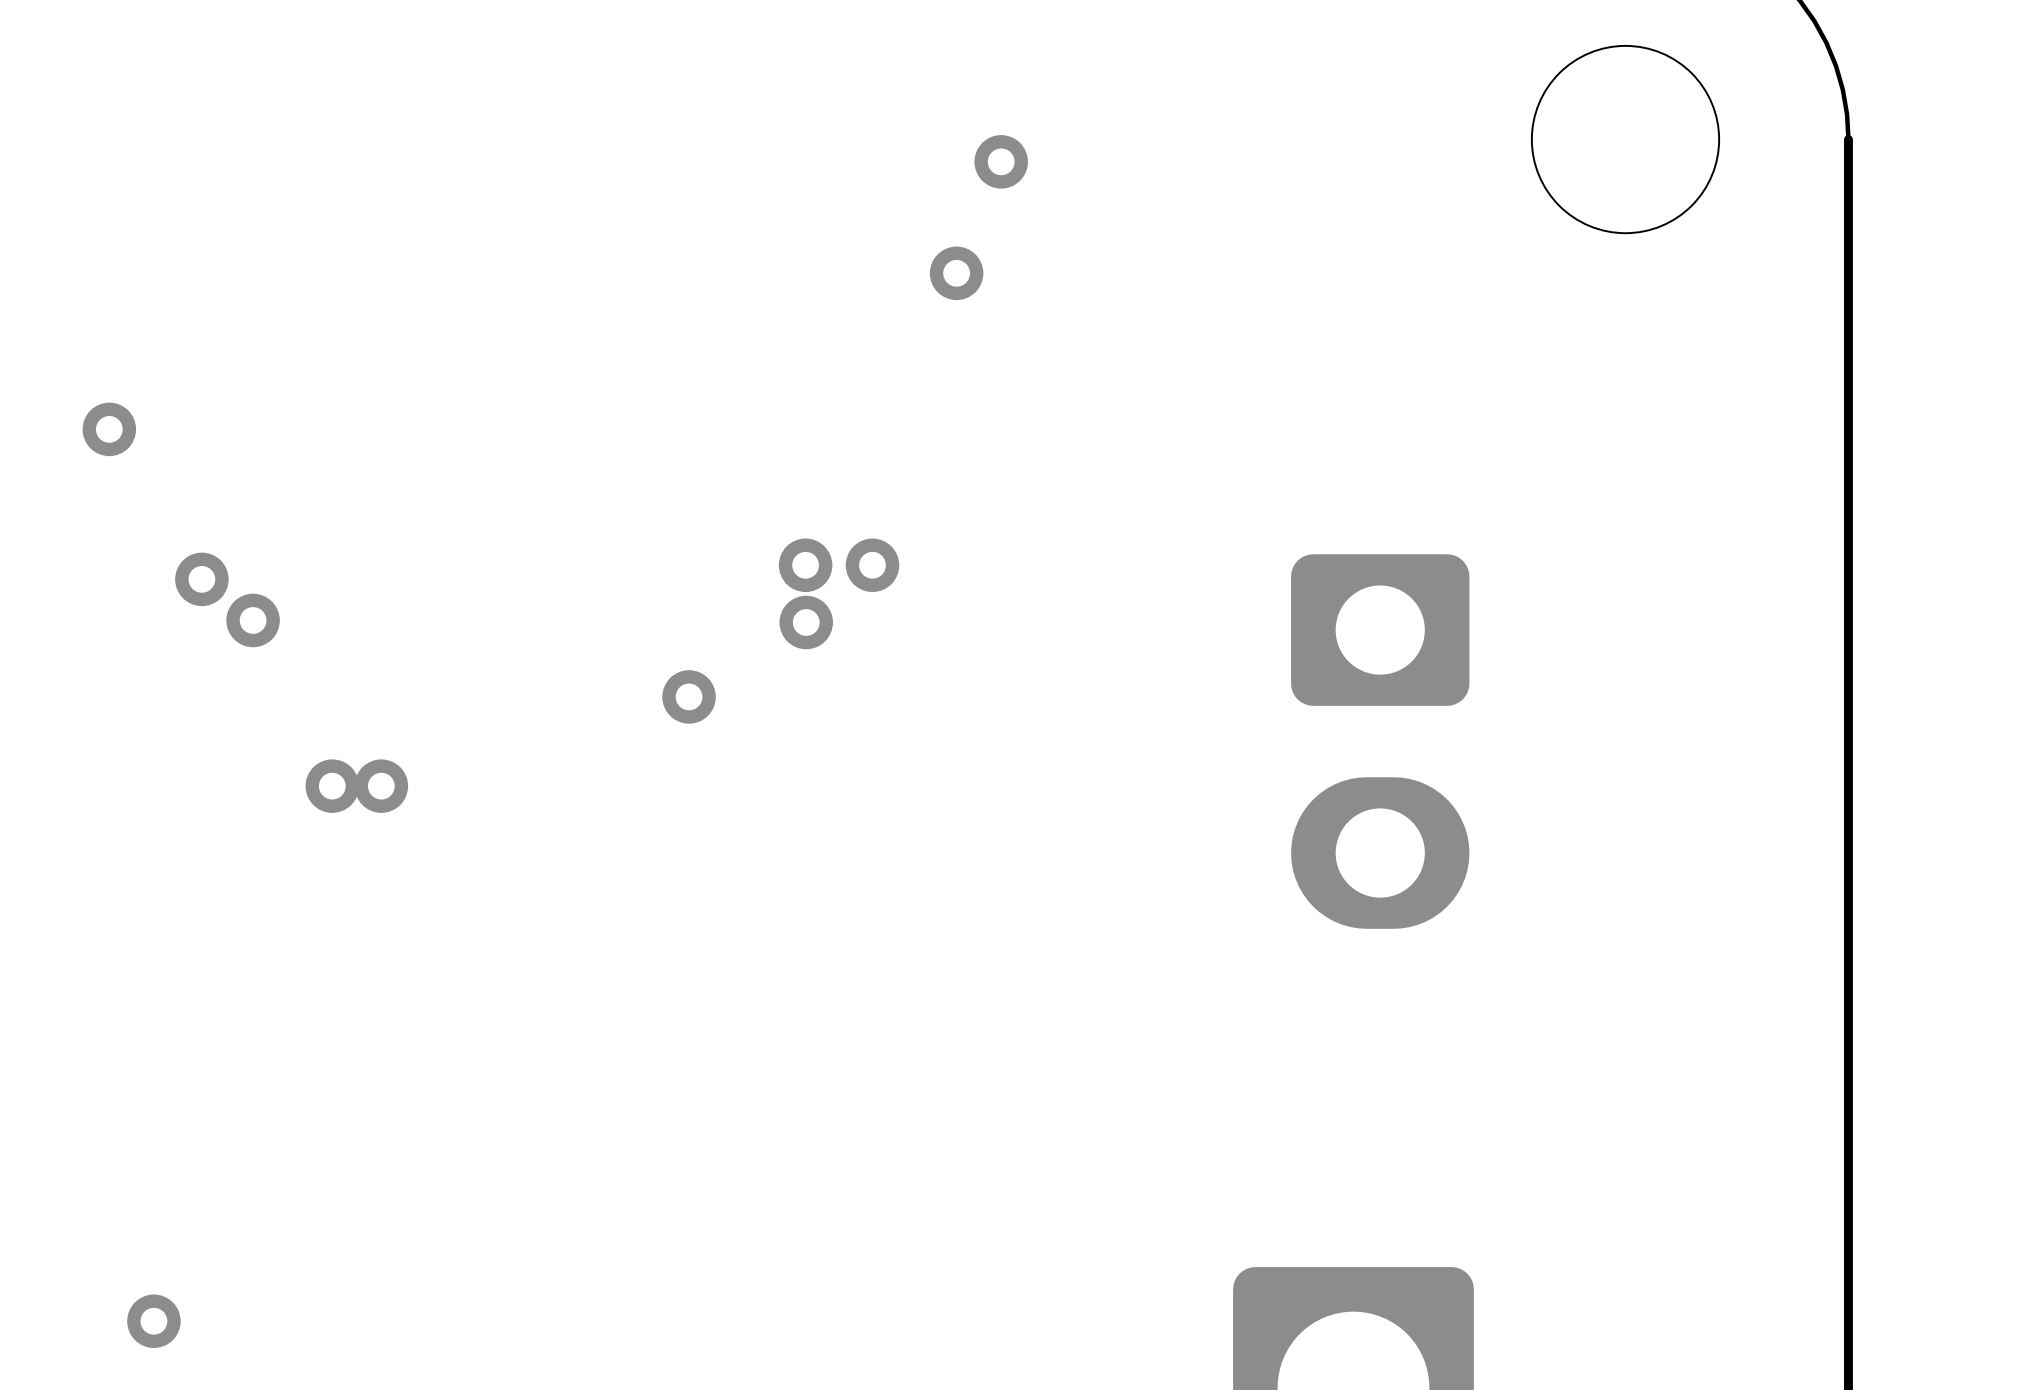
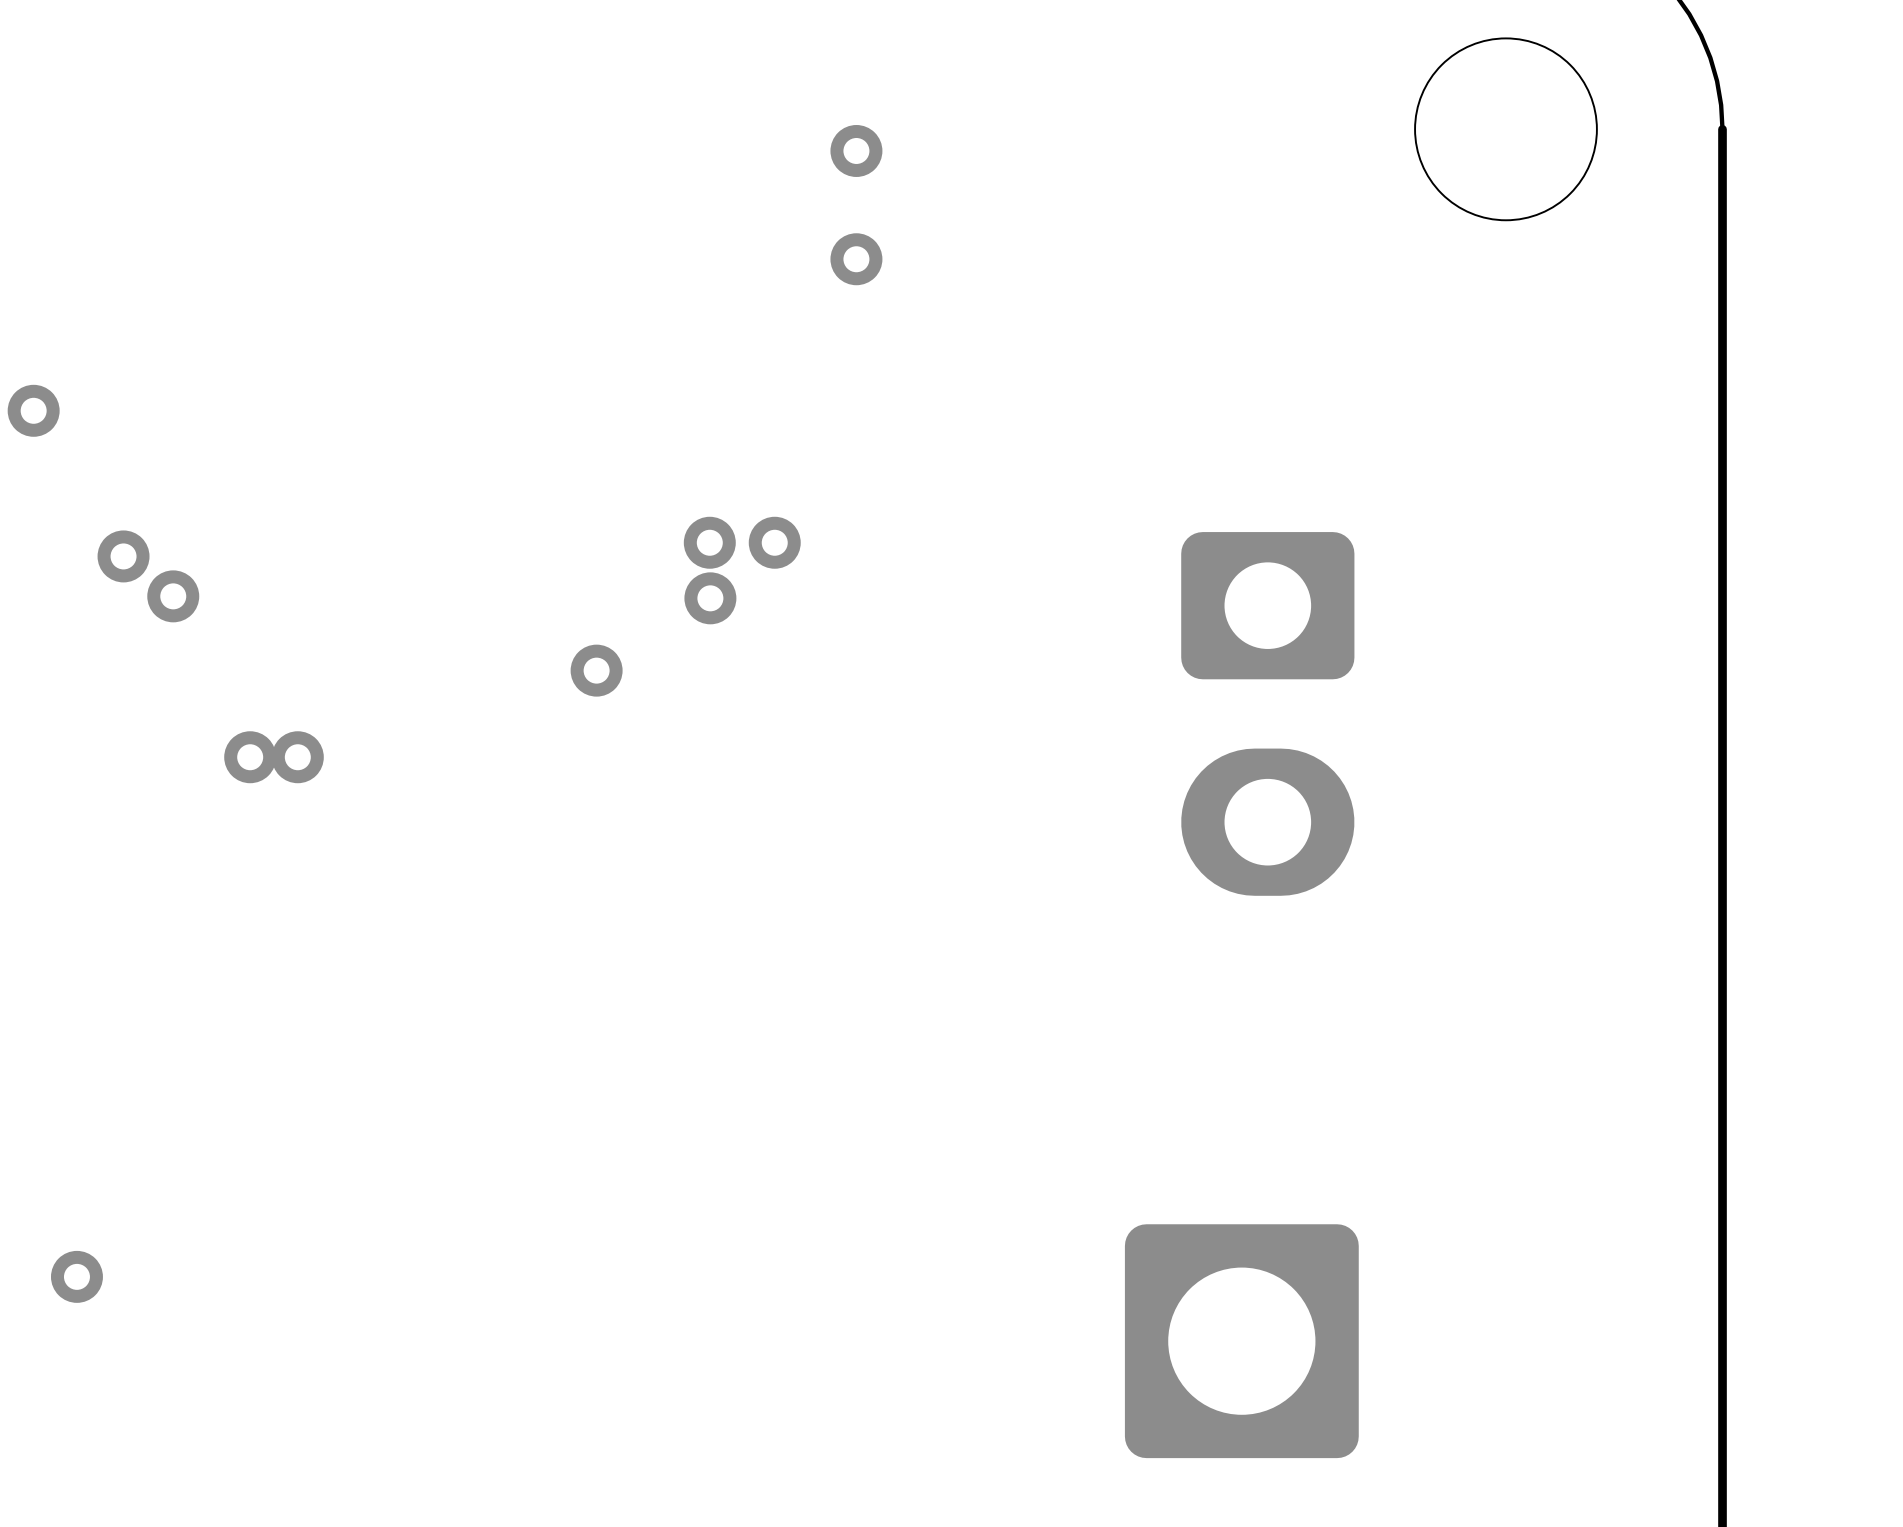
via position: (1001, 161) -> (856, 150)

